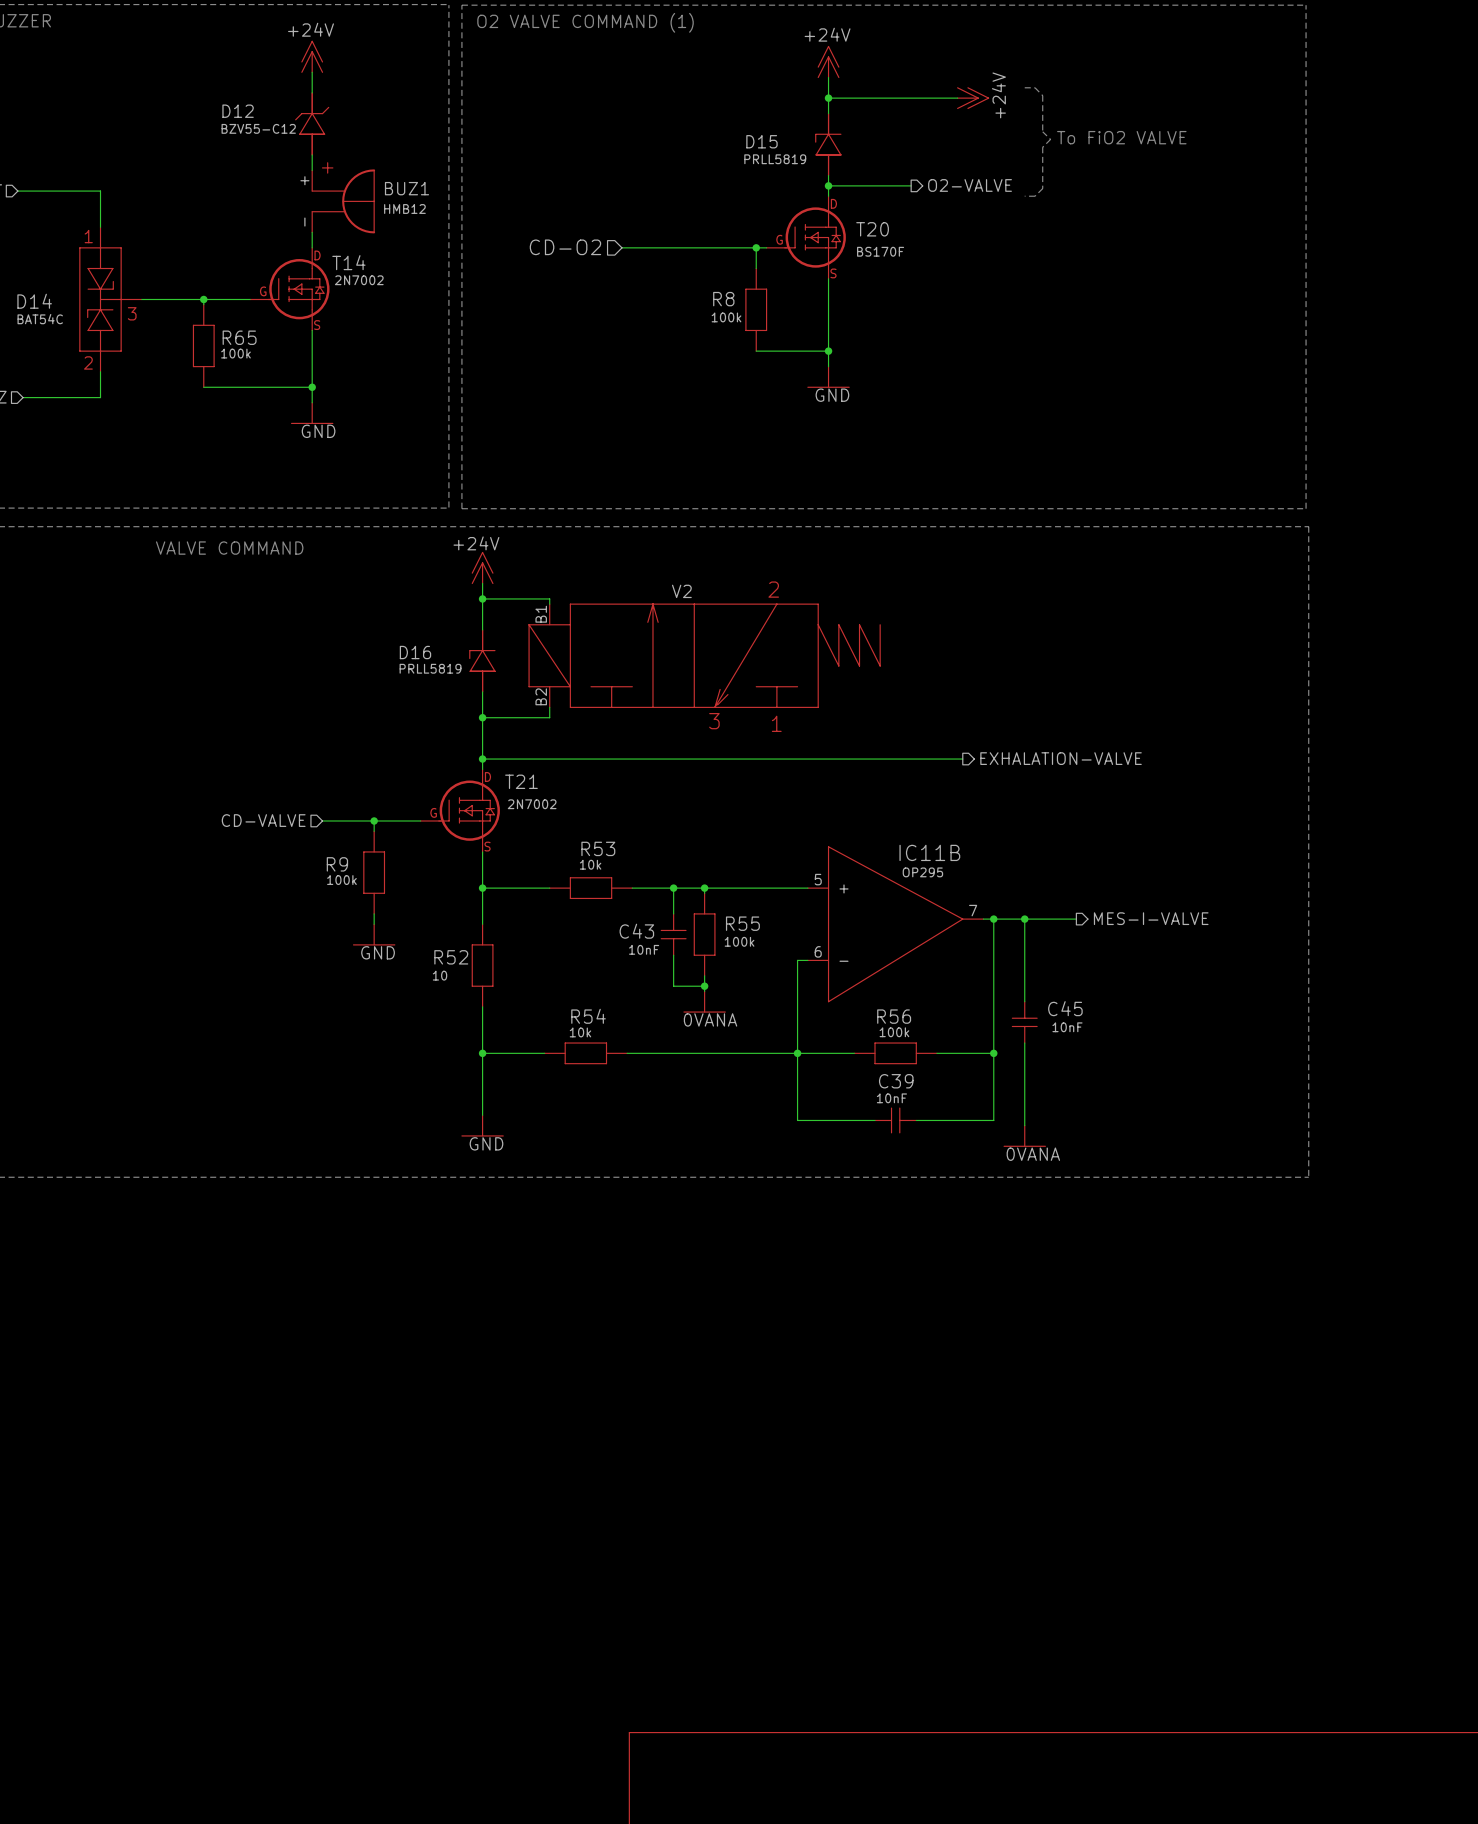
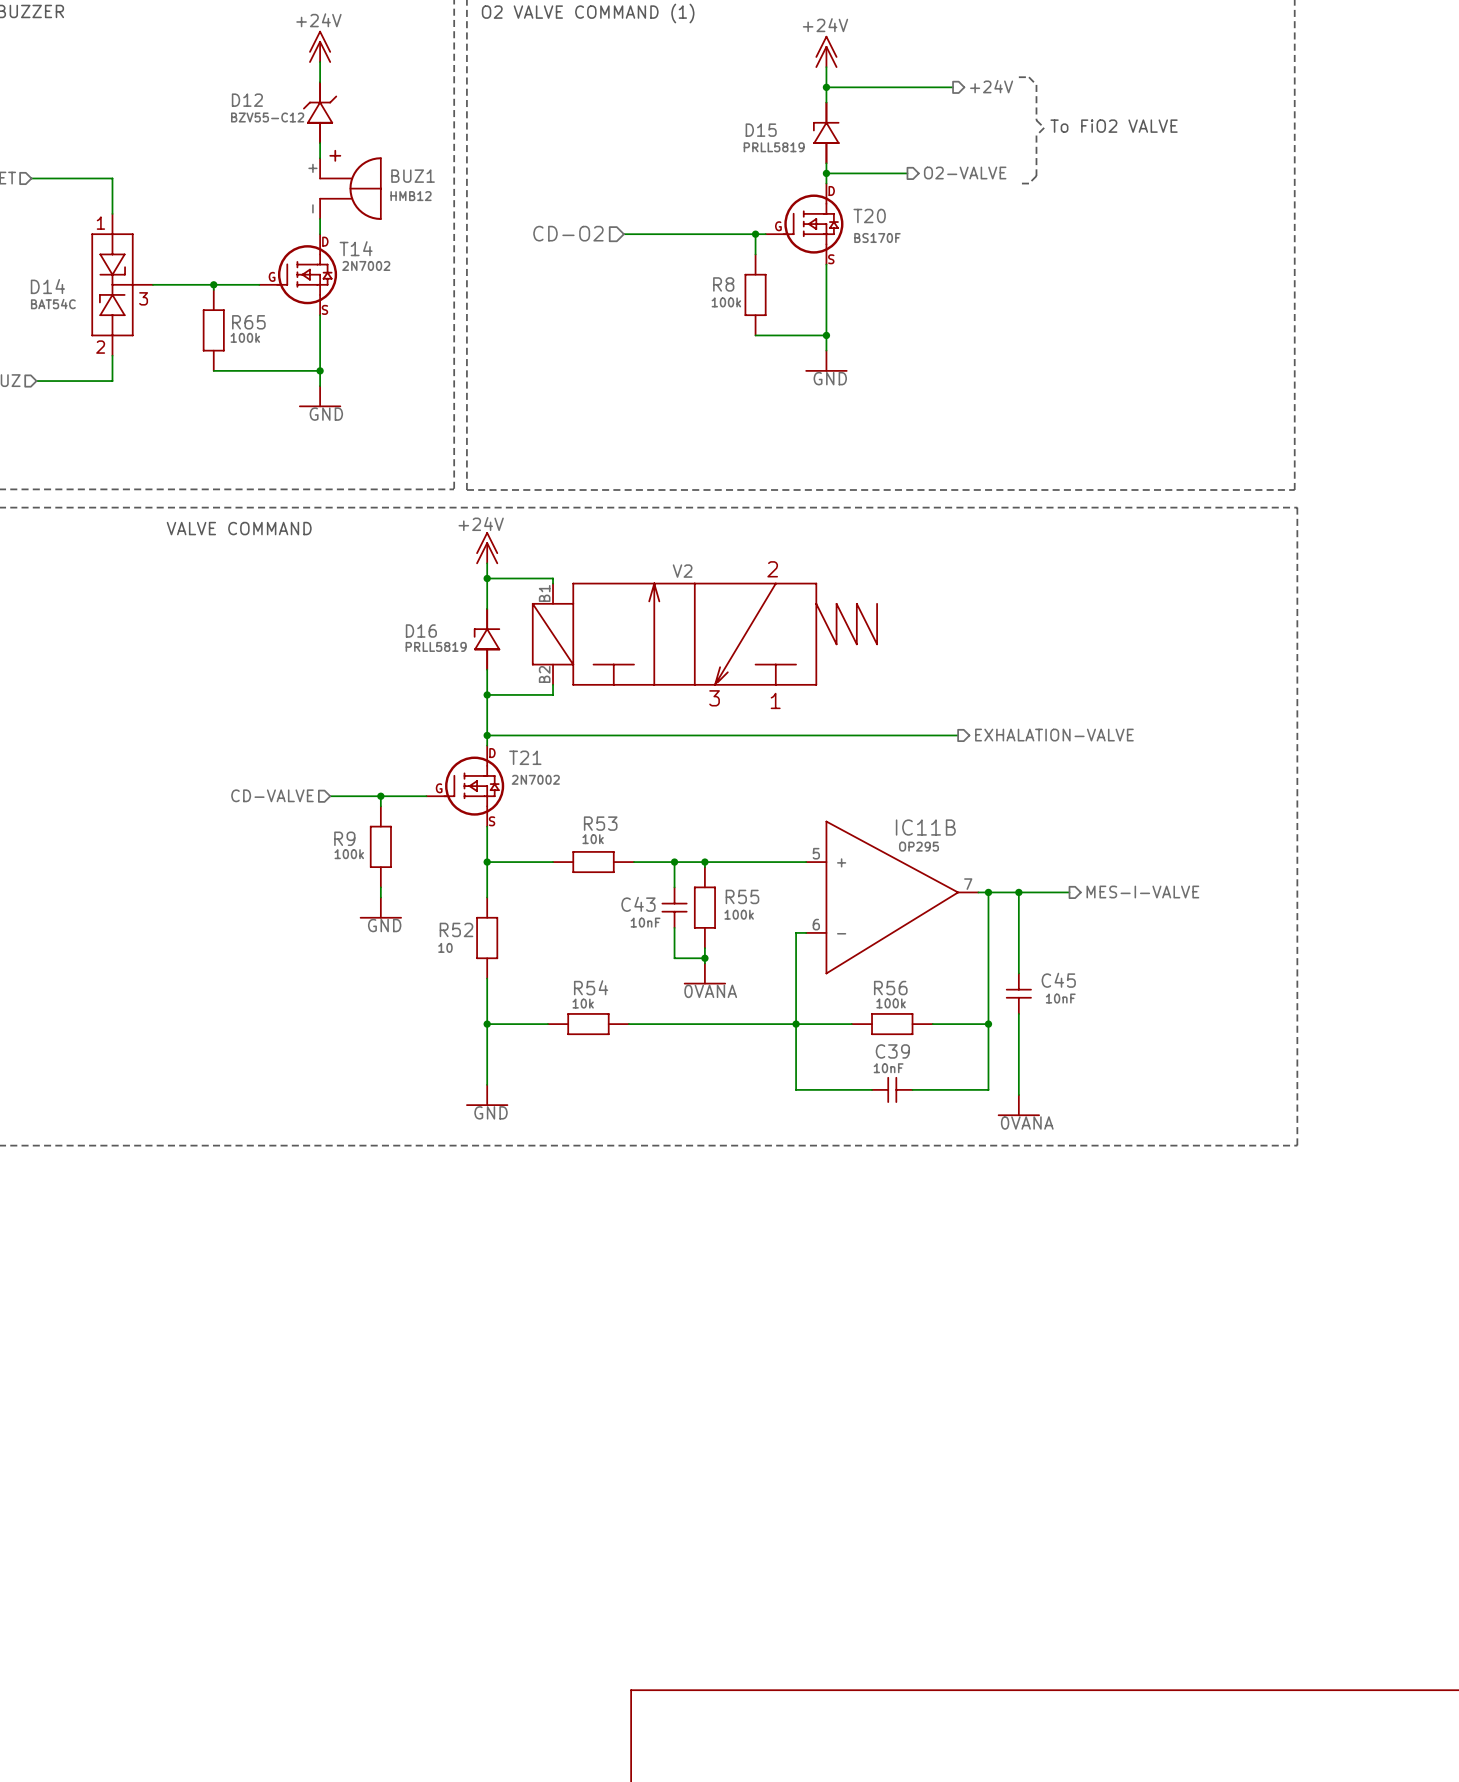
hierarchical label: none -> +24V (991, 86)
power symbol: +24V (973, 98) -> none

